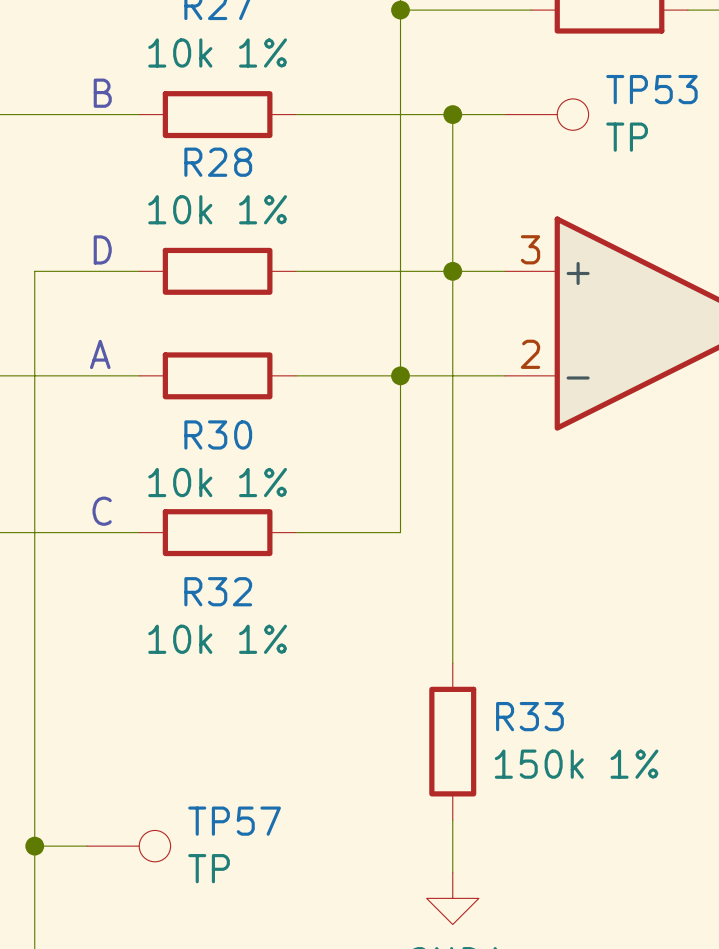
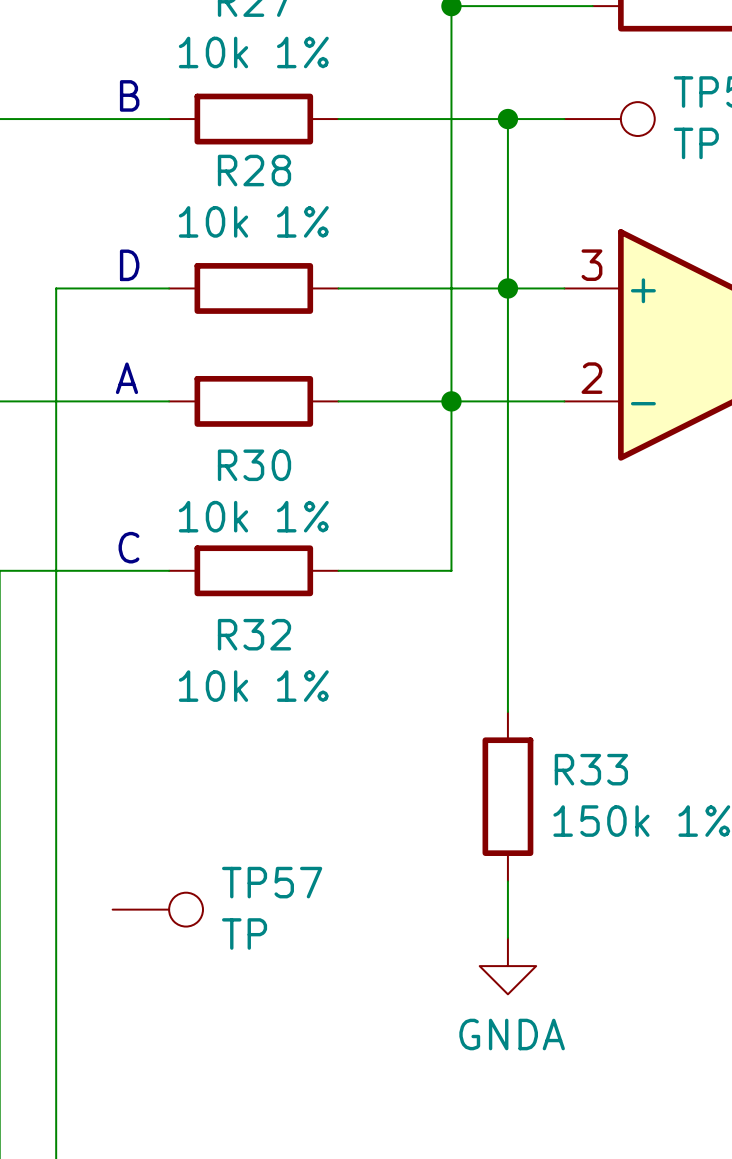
wire: (34, 846) (86, 846) -> none
junction: (34, 846) -> none

